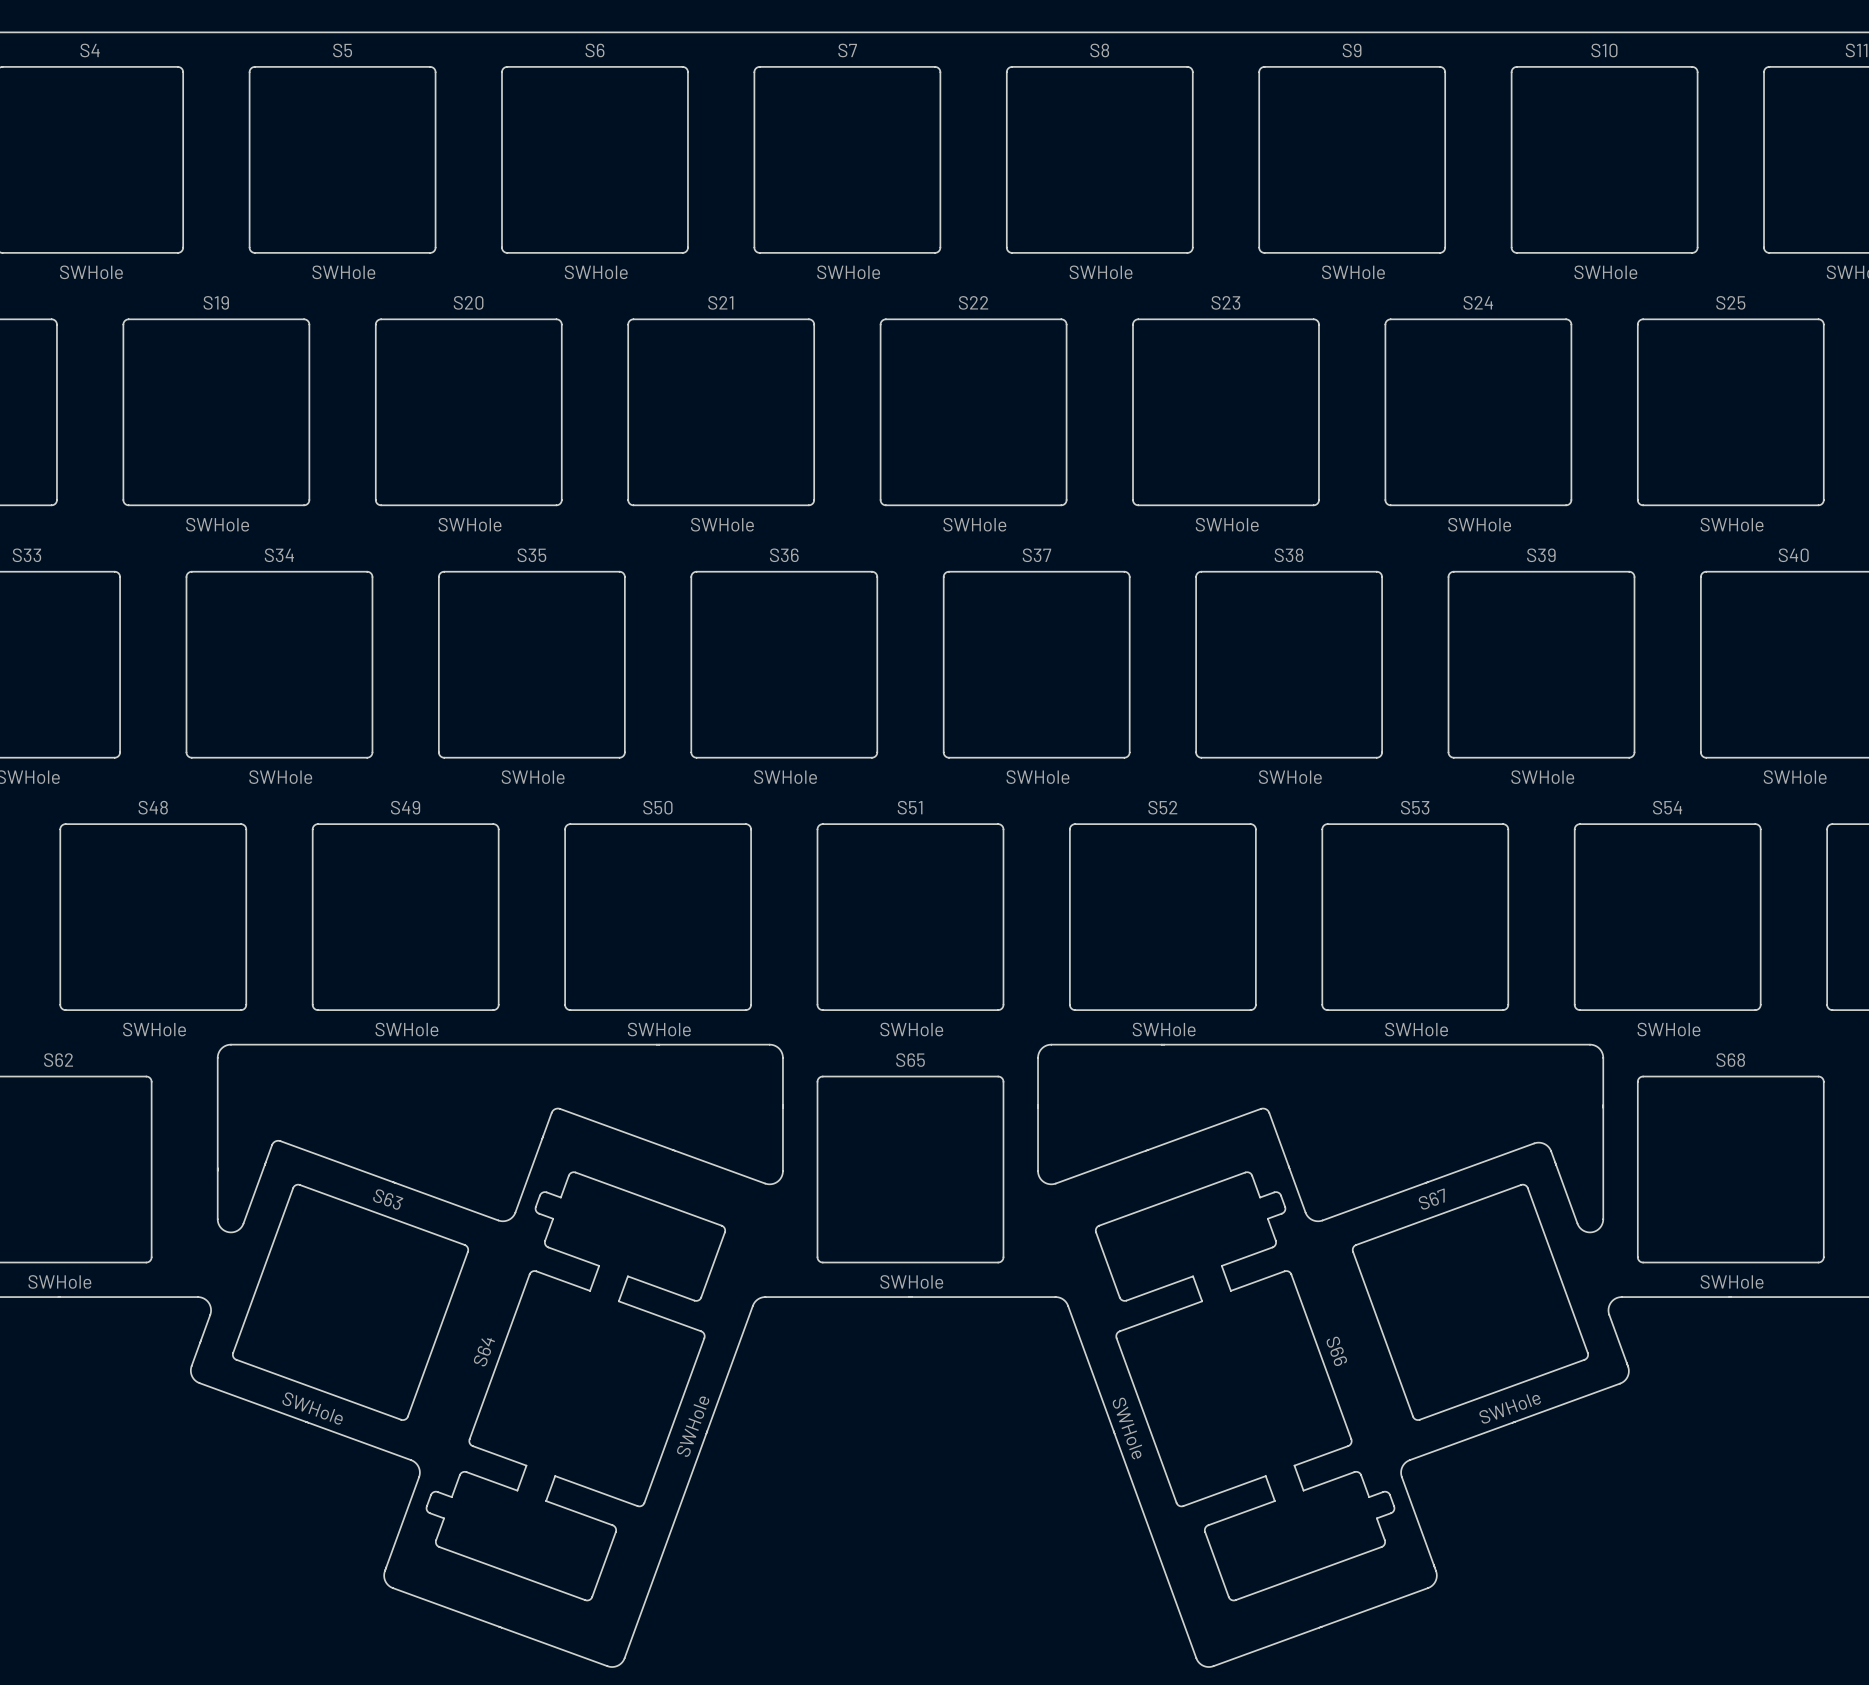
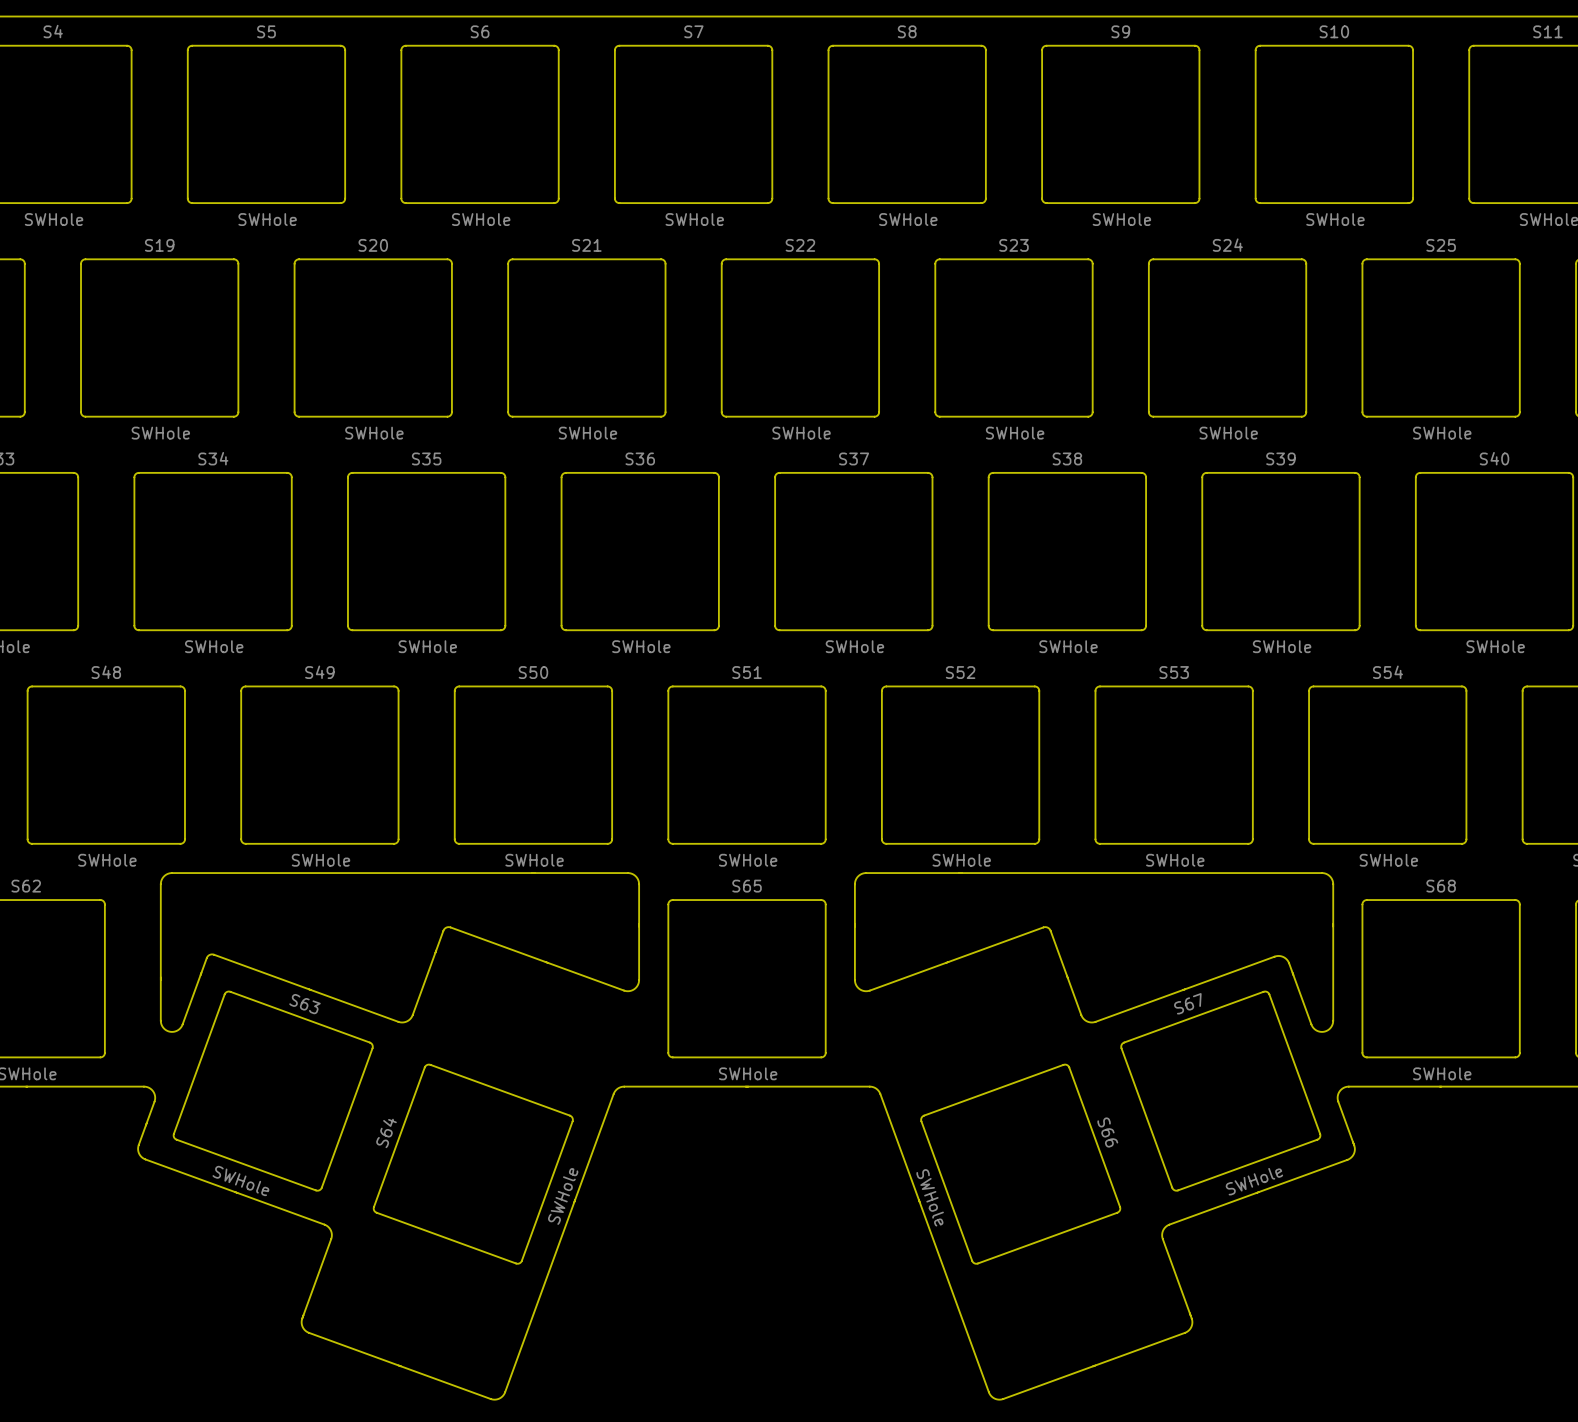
S64 footprint: [425, 1171, 726, 1602] -> [373, 1063, 574, 1265]
S66 footprint: [1094, 1171, 1396, 1602] -> [920, 1063, 1121, 1265]

